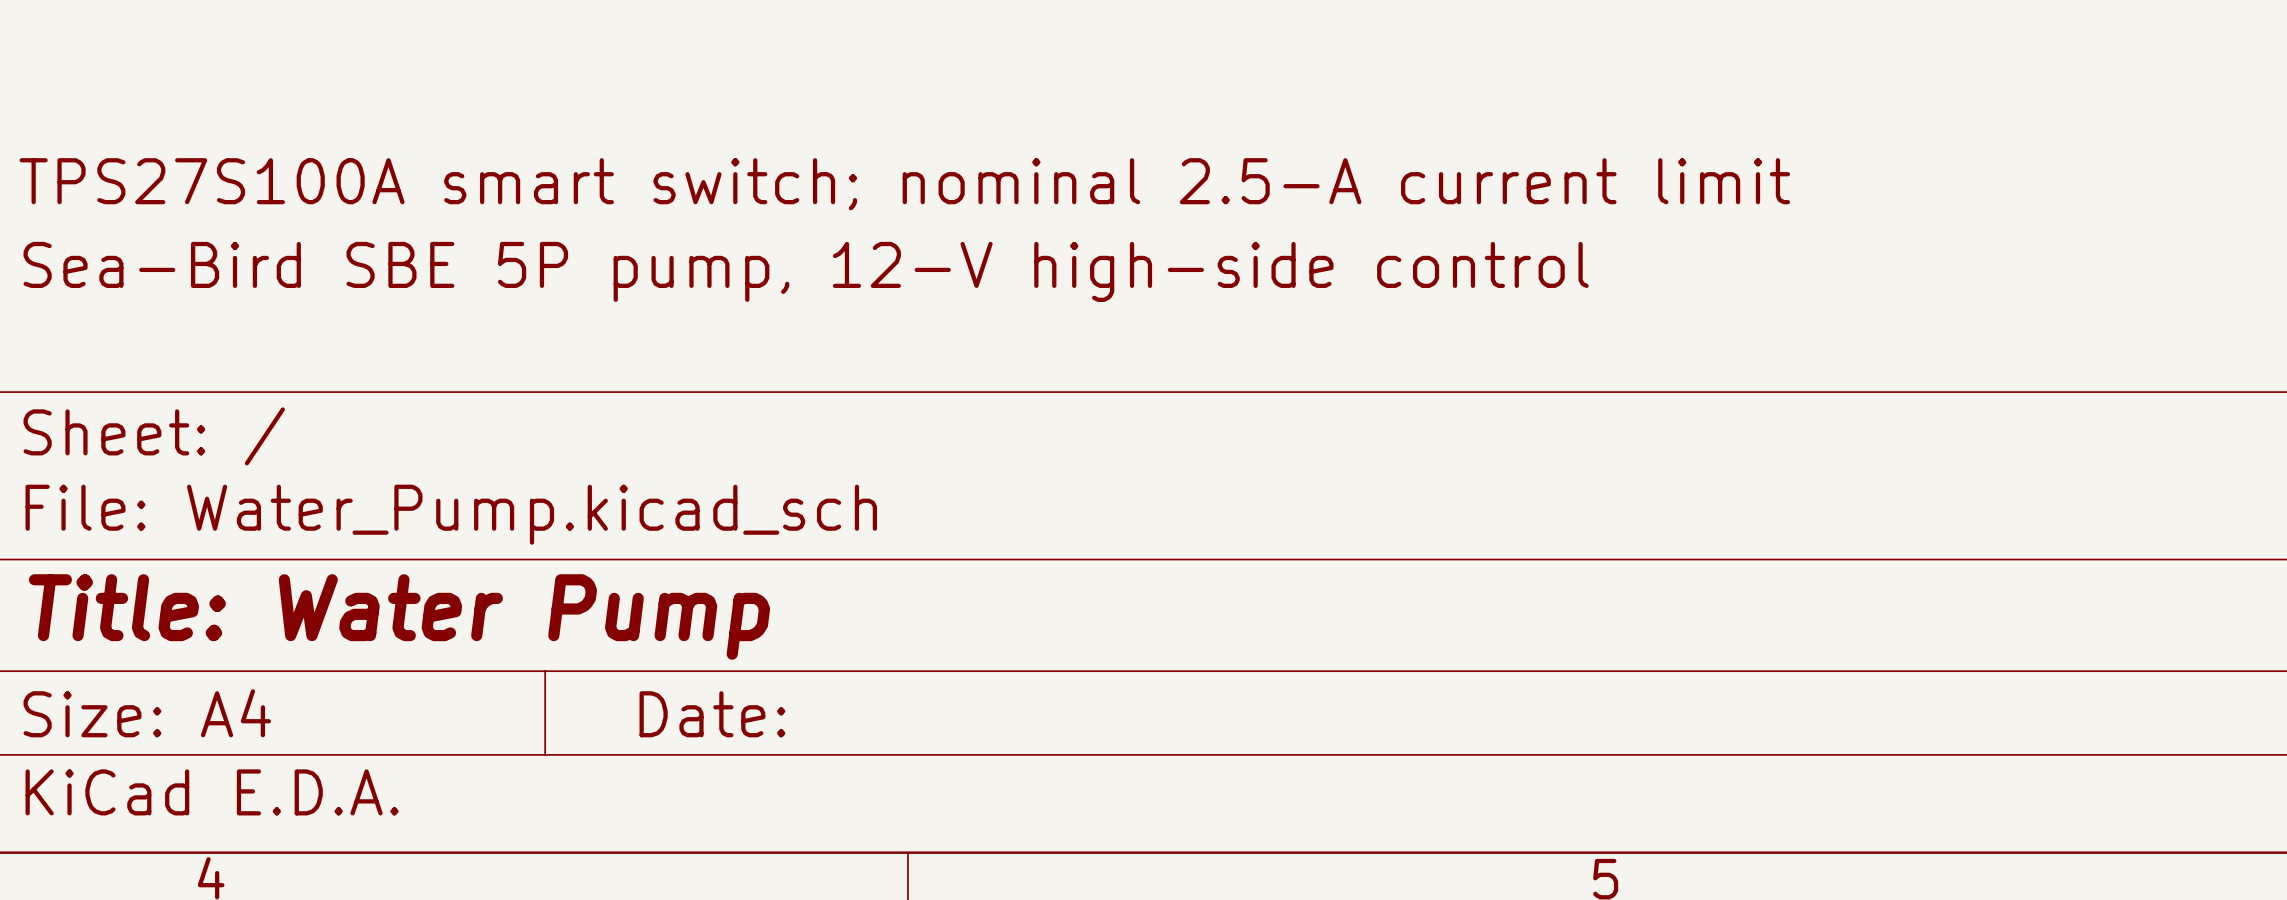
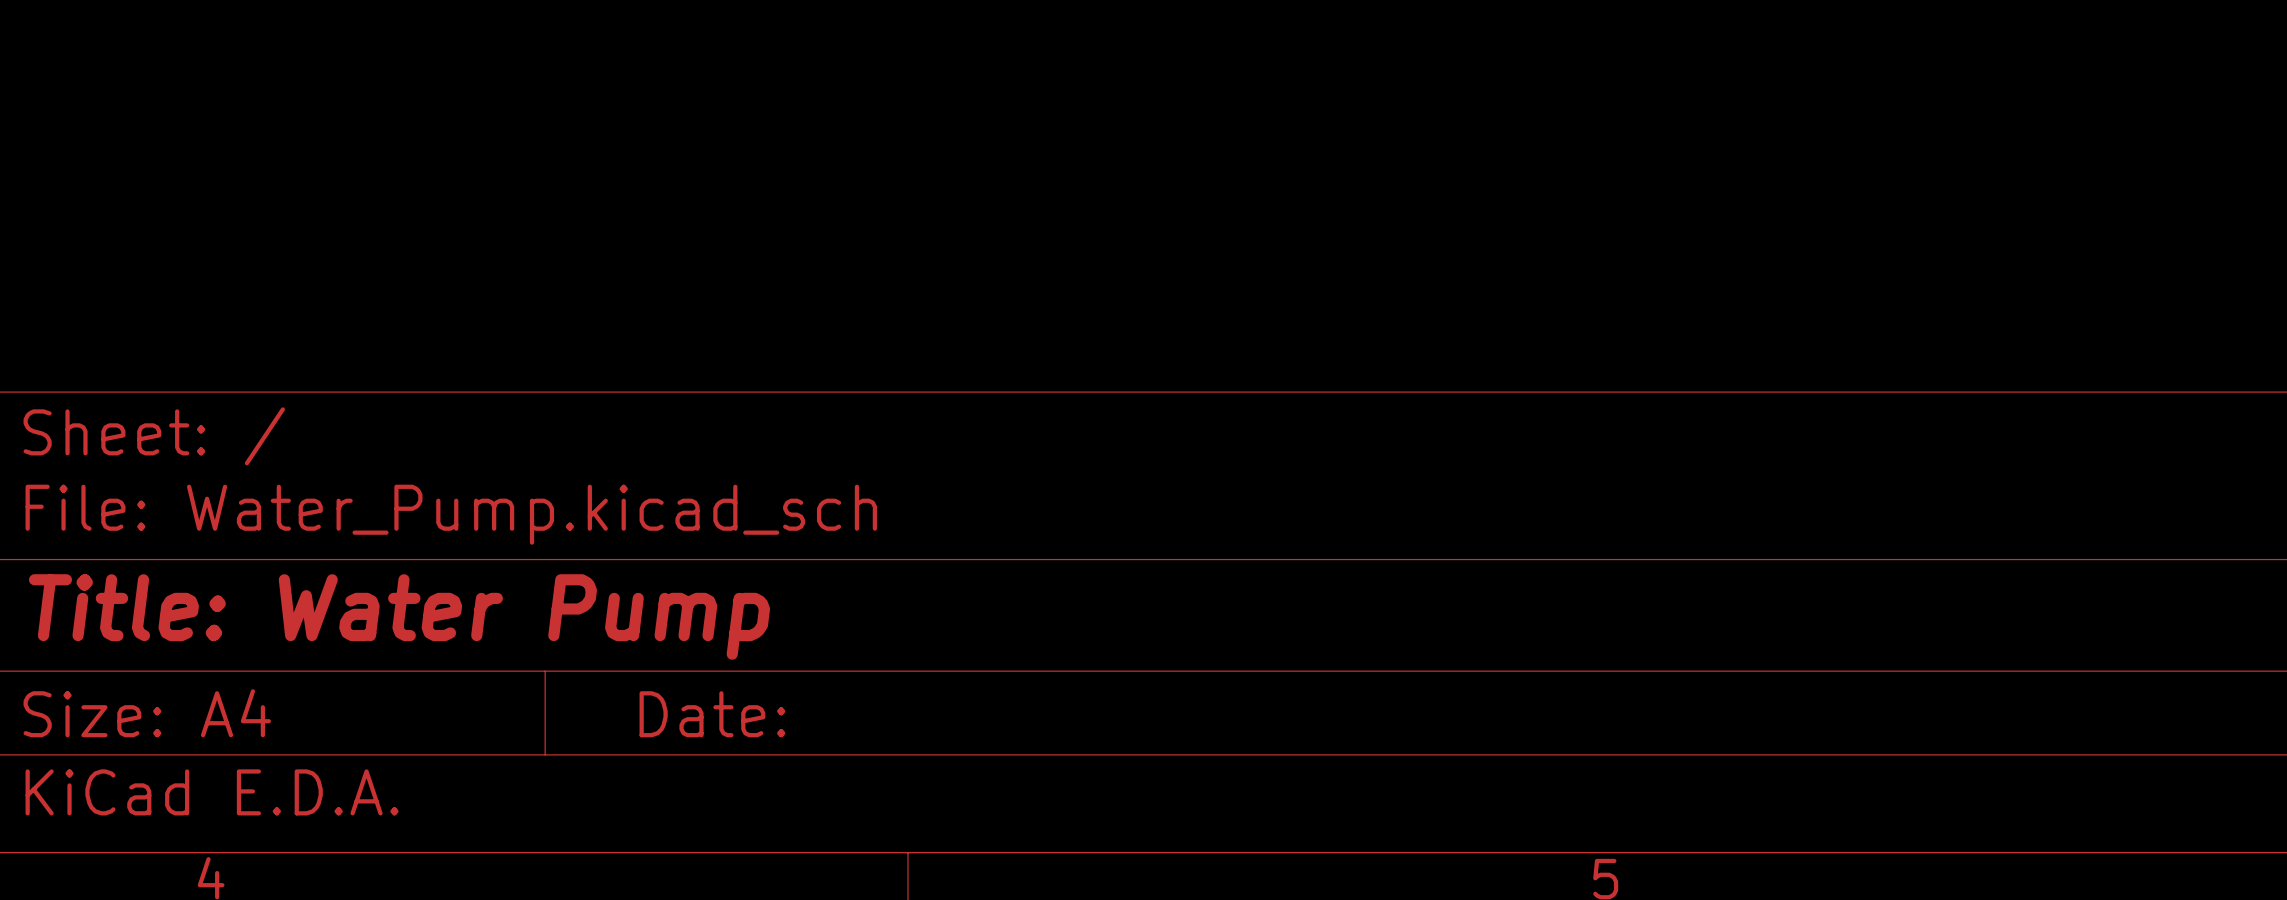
title block: TPS27S100A smart switch; nominal 2.5-A current limit (904, 184) -> none
title block: Sea-Bird SBE 5P pump, 12-V high-side control (806, 271) -> none

